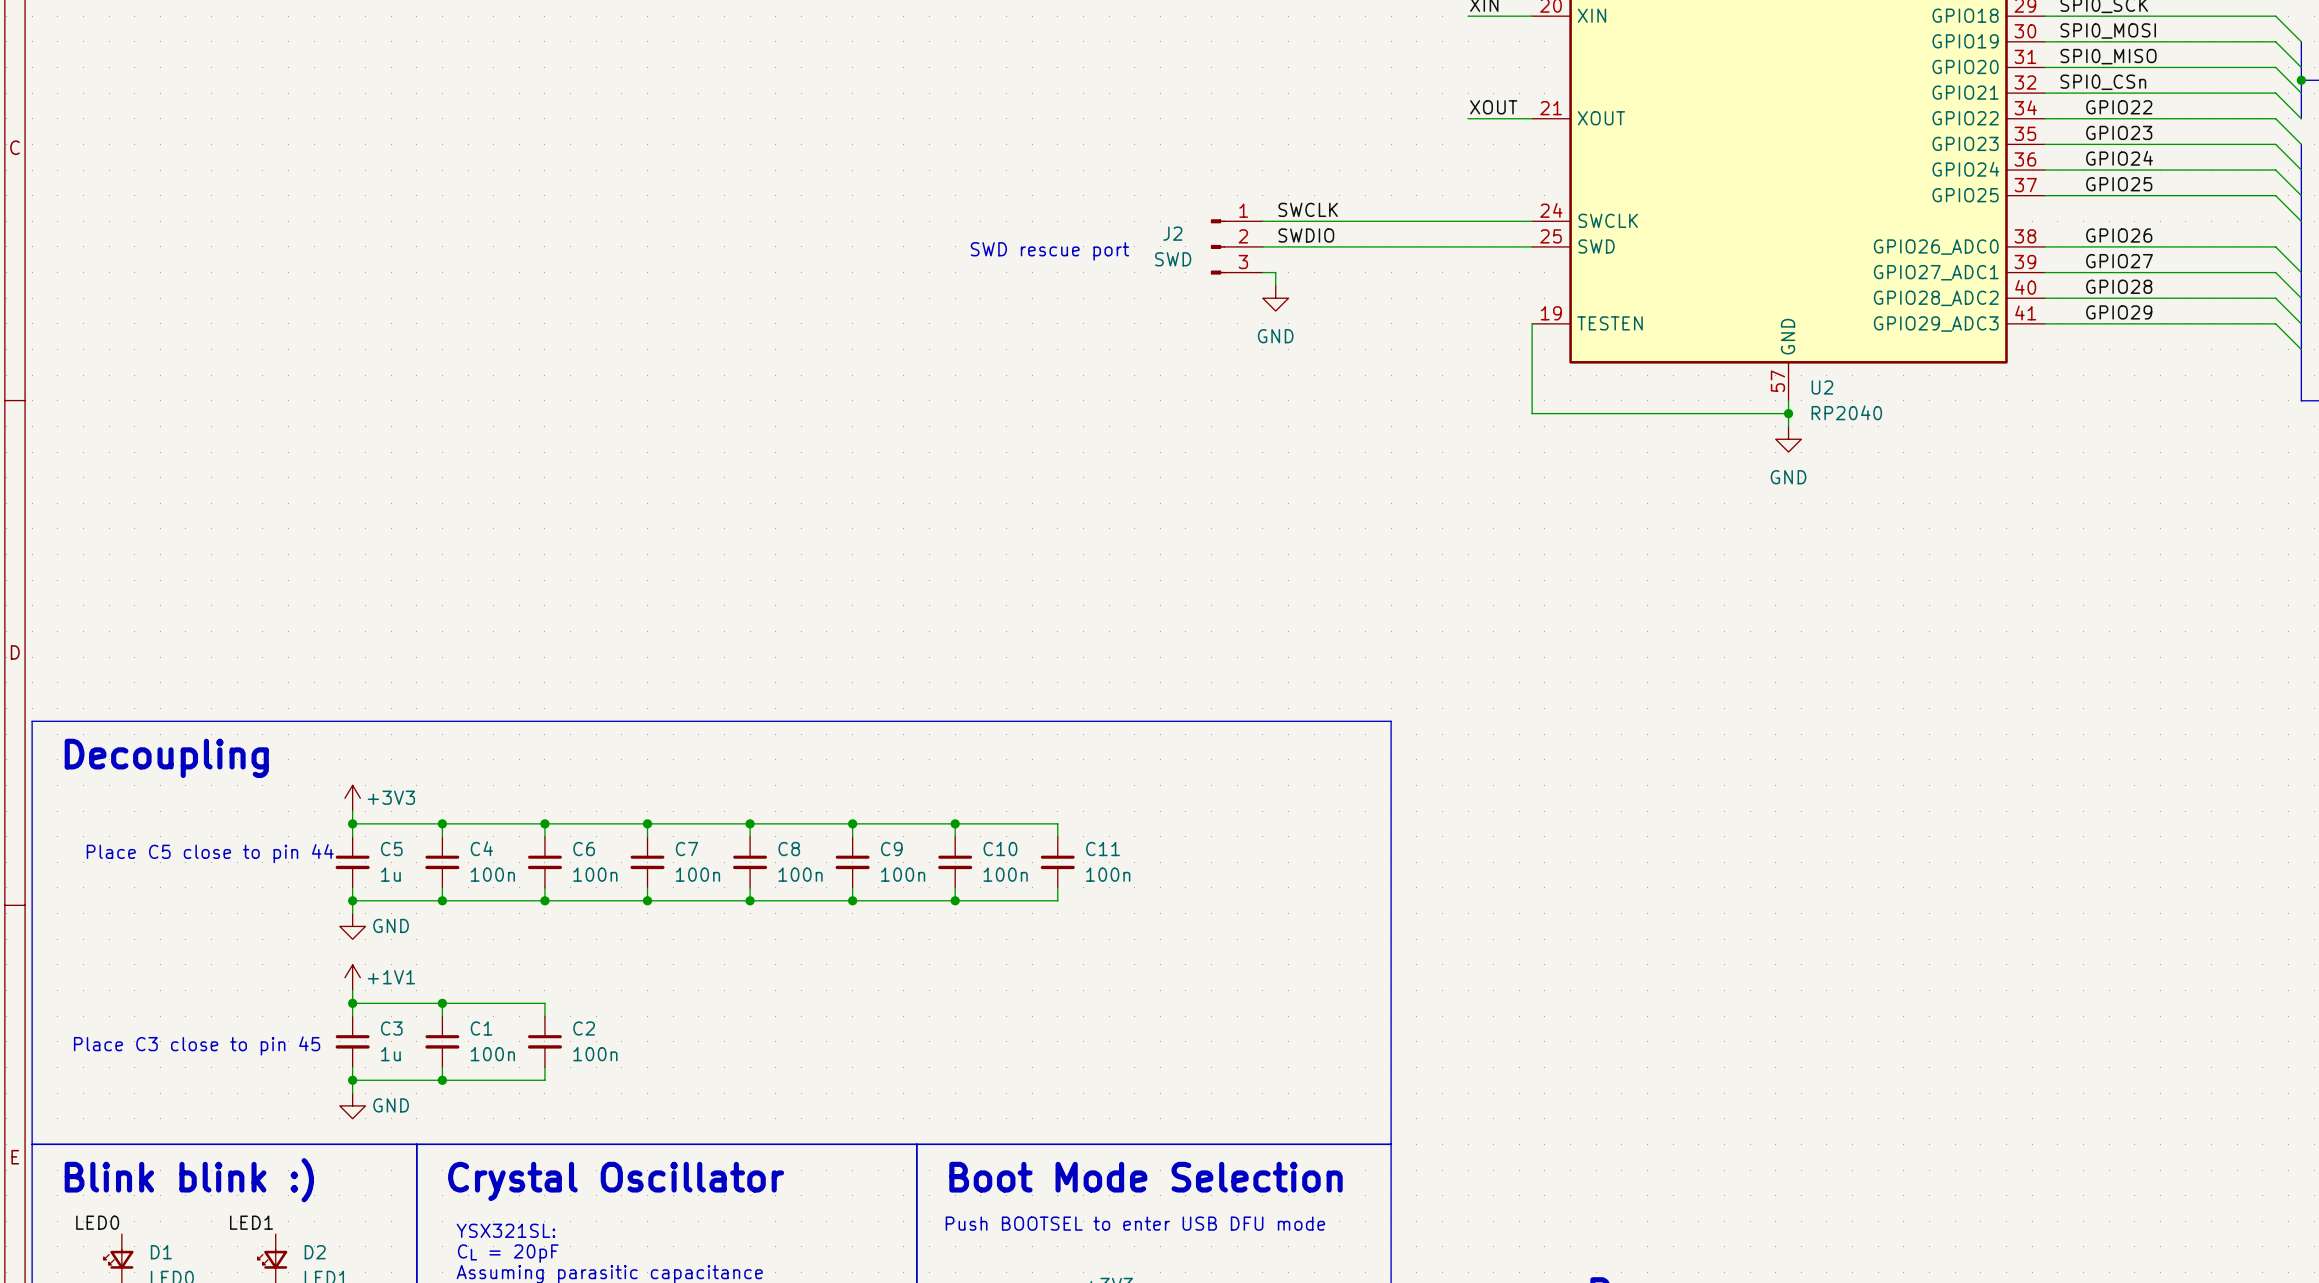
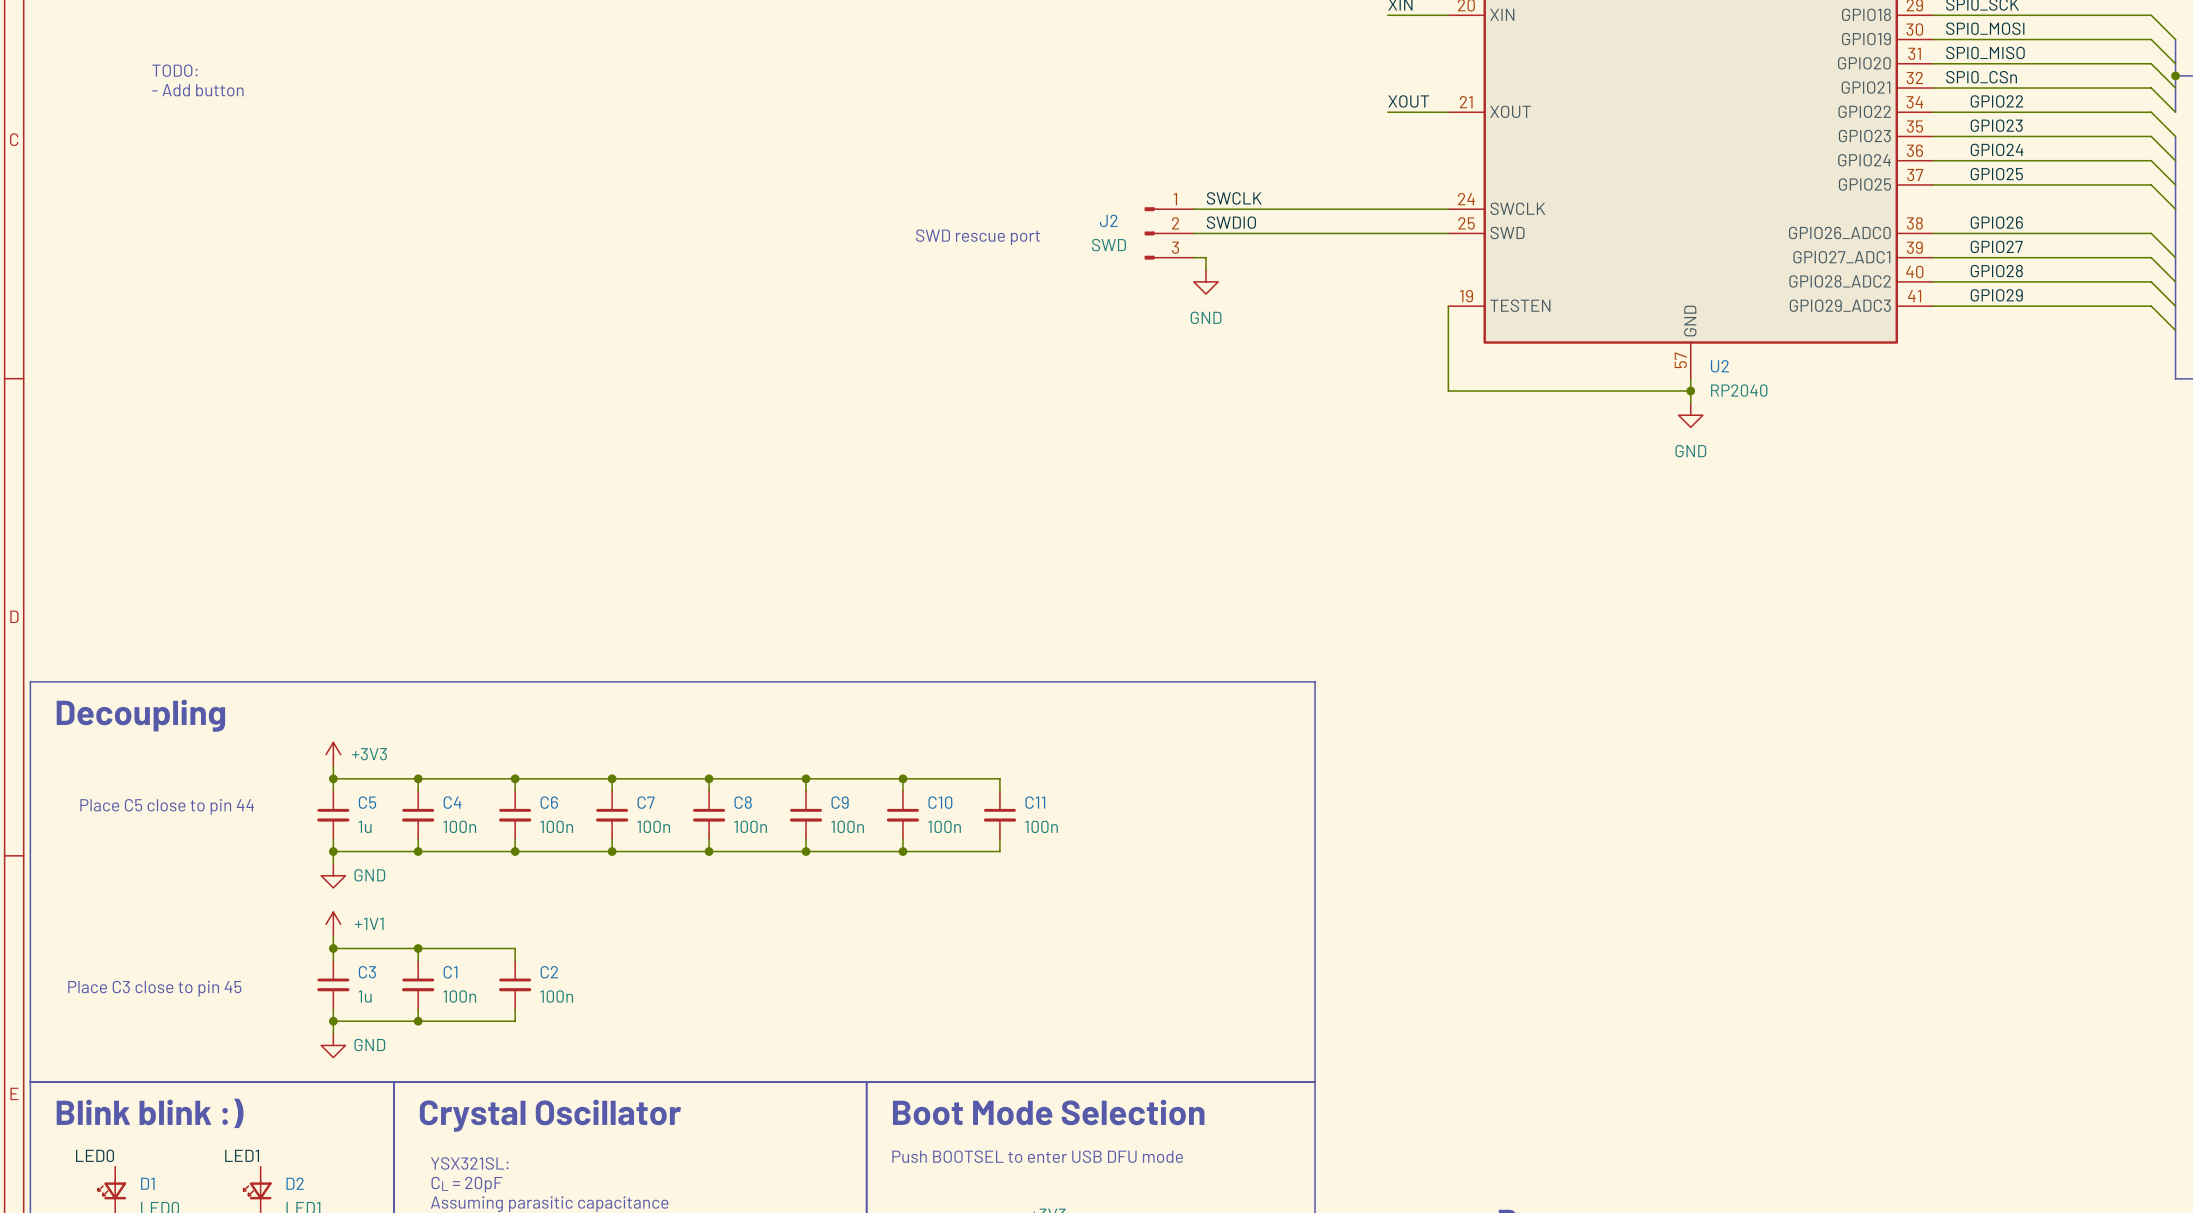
text: none -> TODO: (174, 70)
text: none -> - Add button (197, 90)

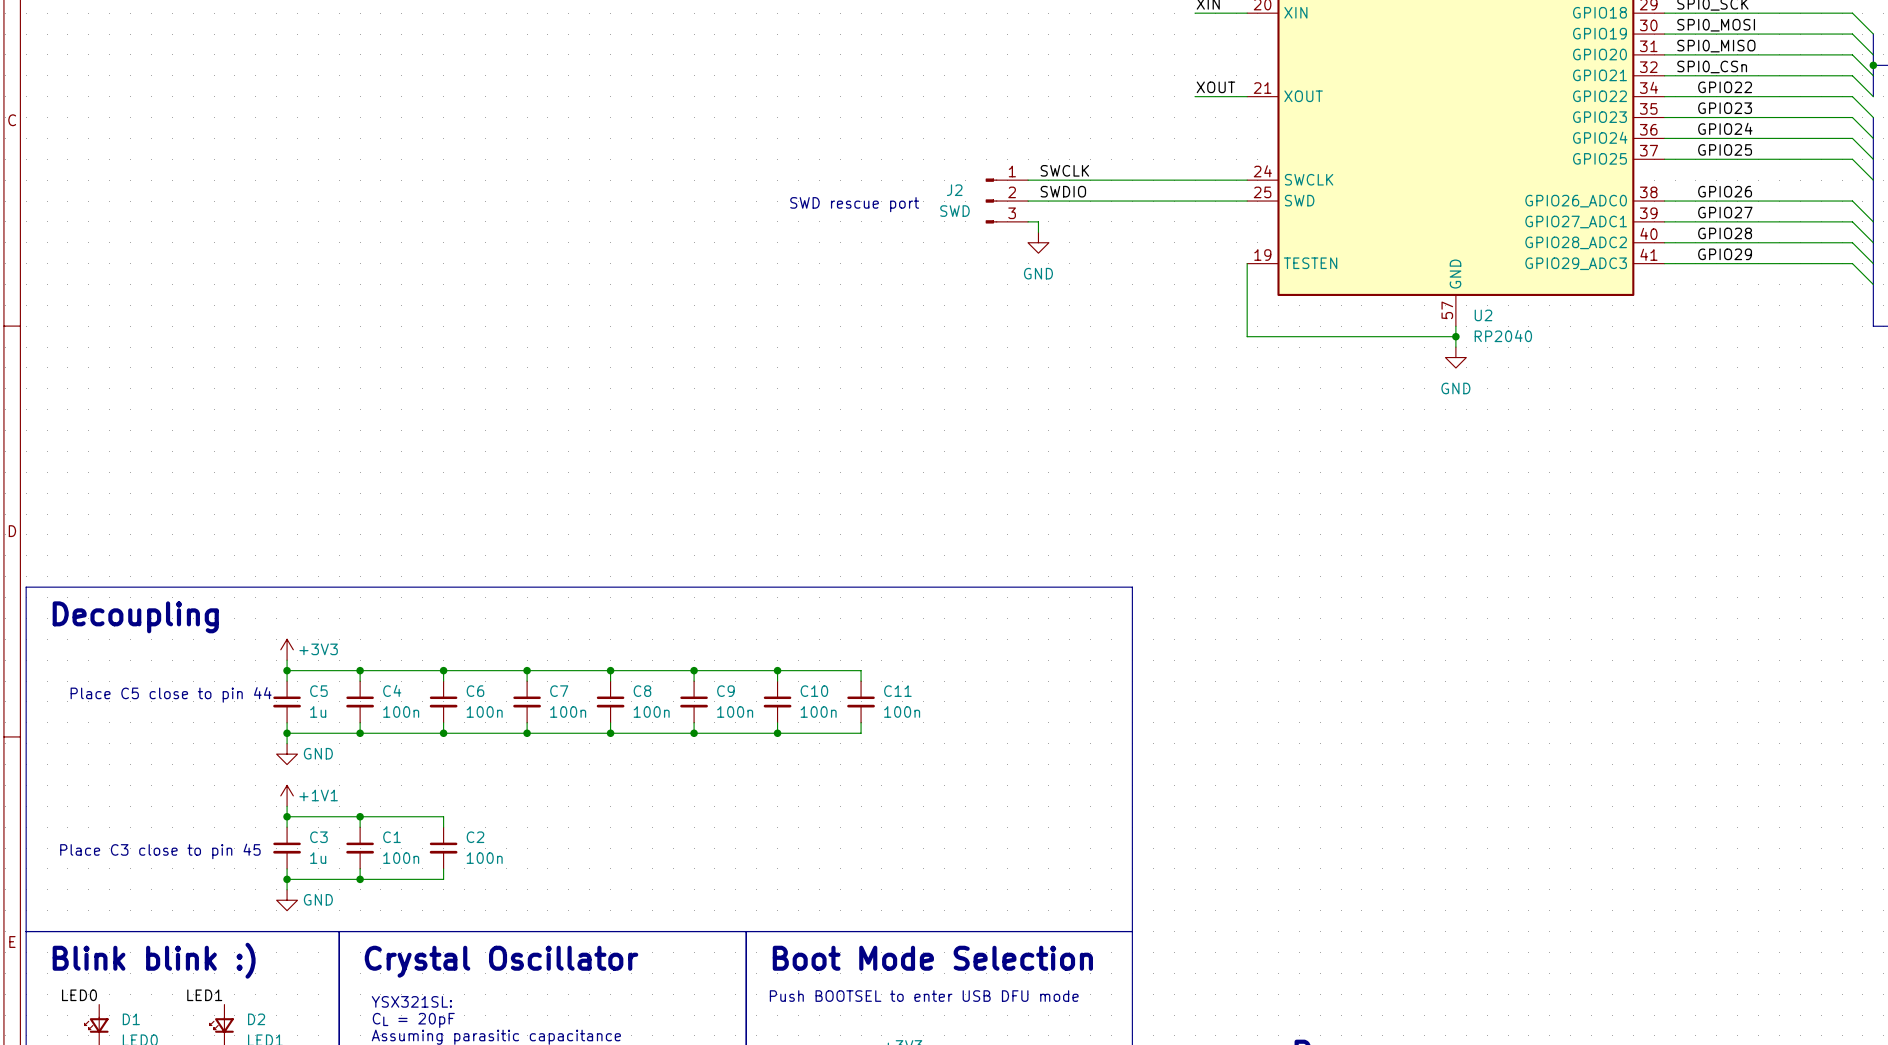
text: TODO: (174, 70) -> none
text: - Add button (197, 90) -> none

